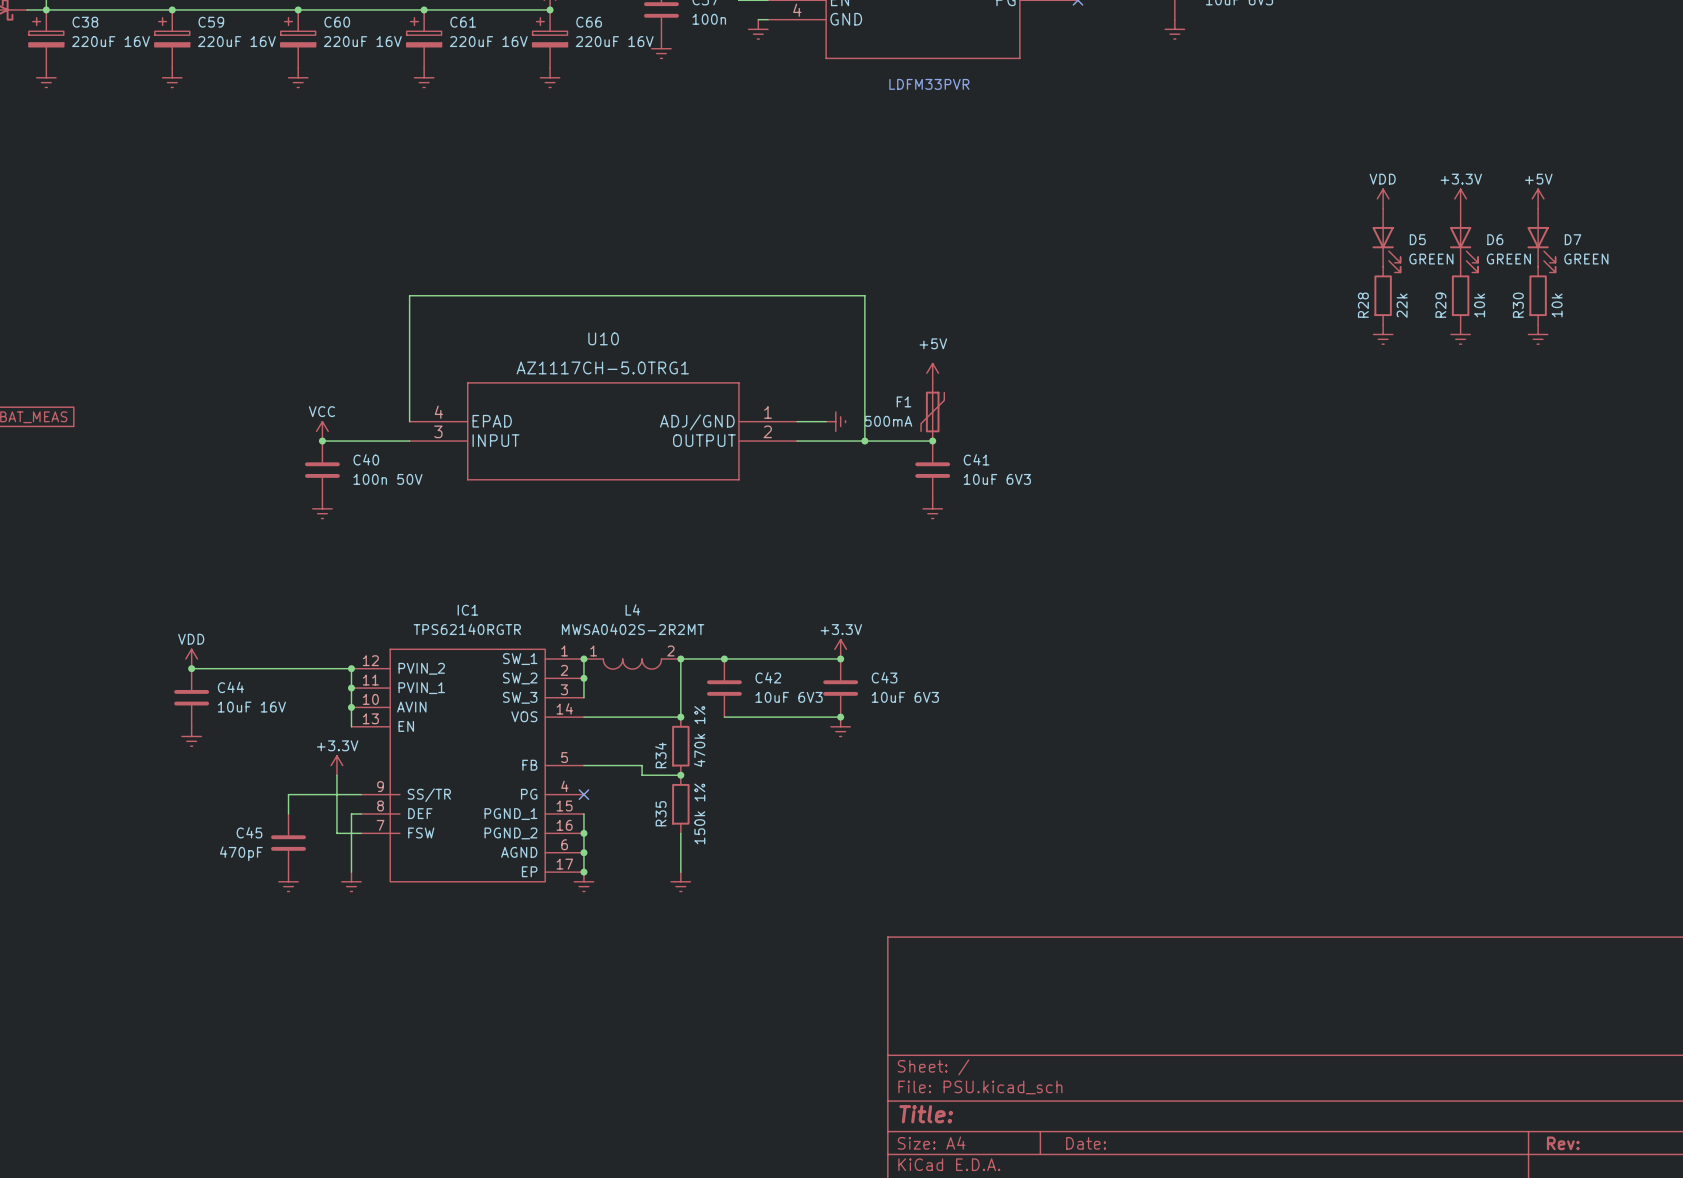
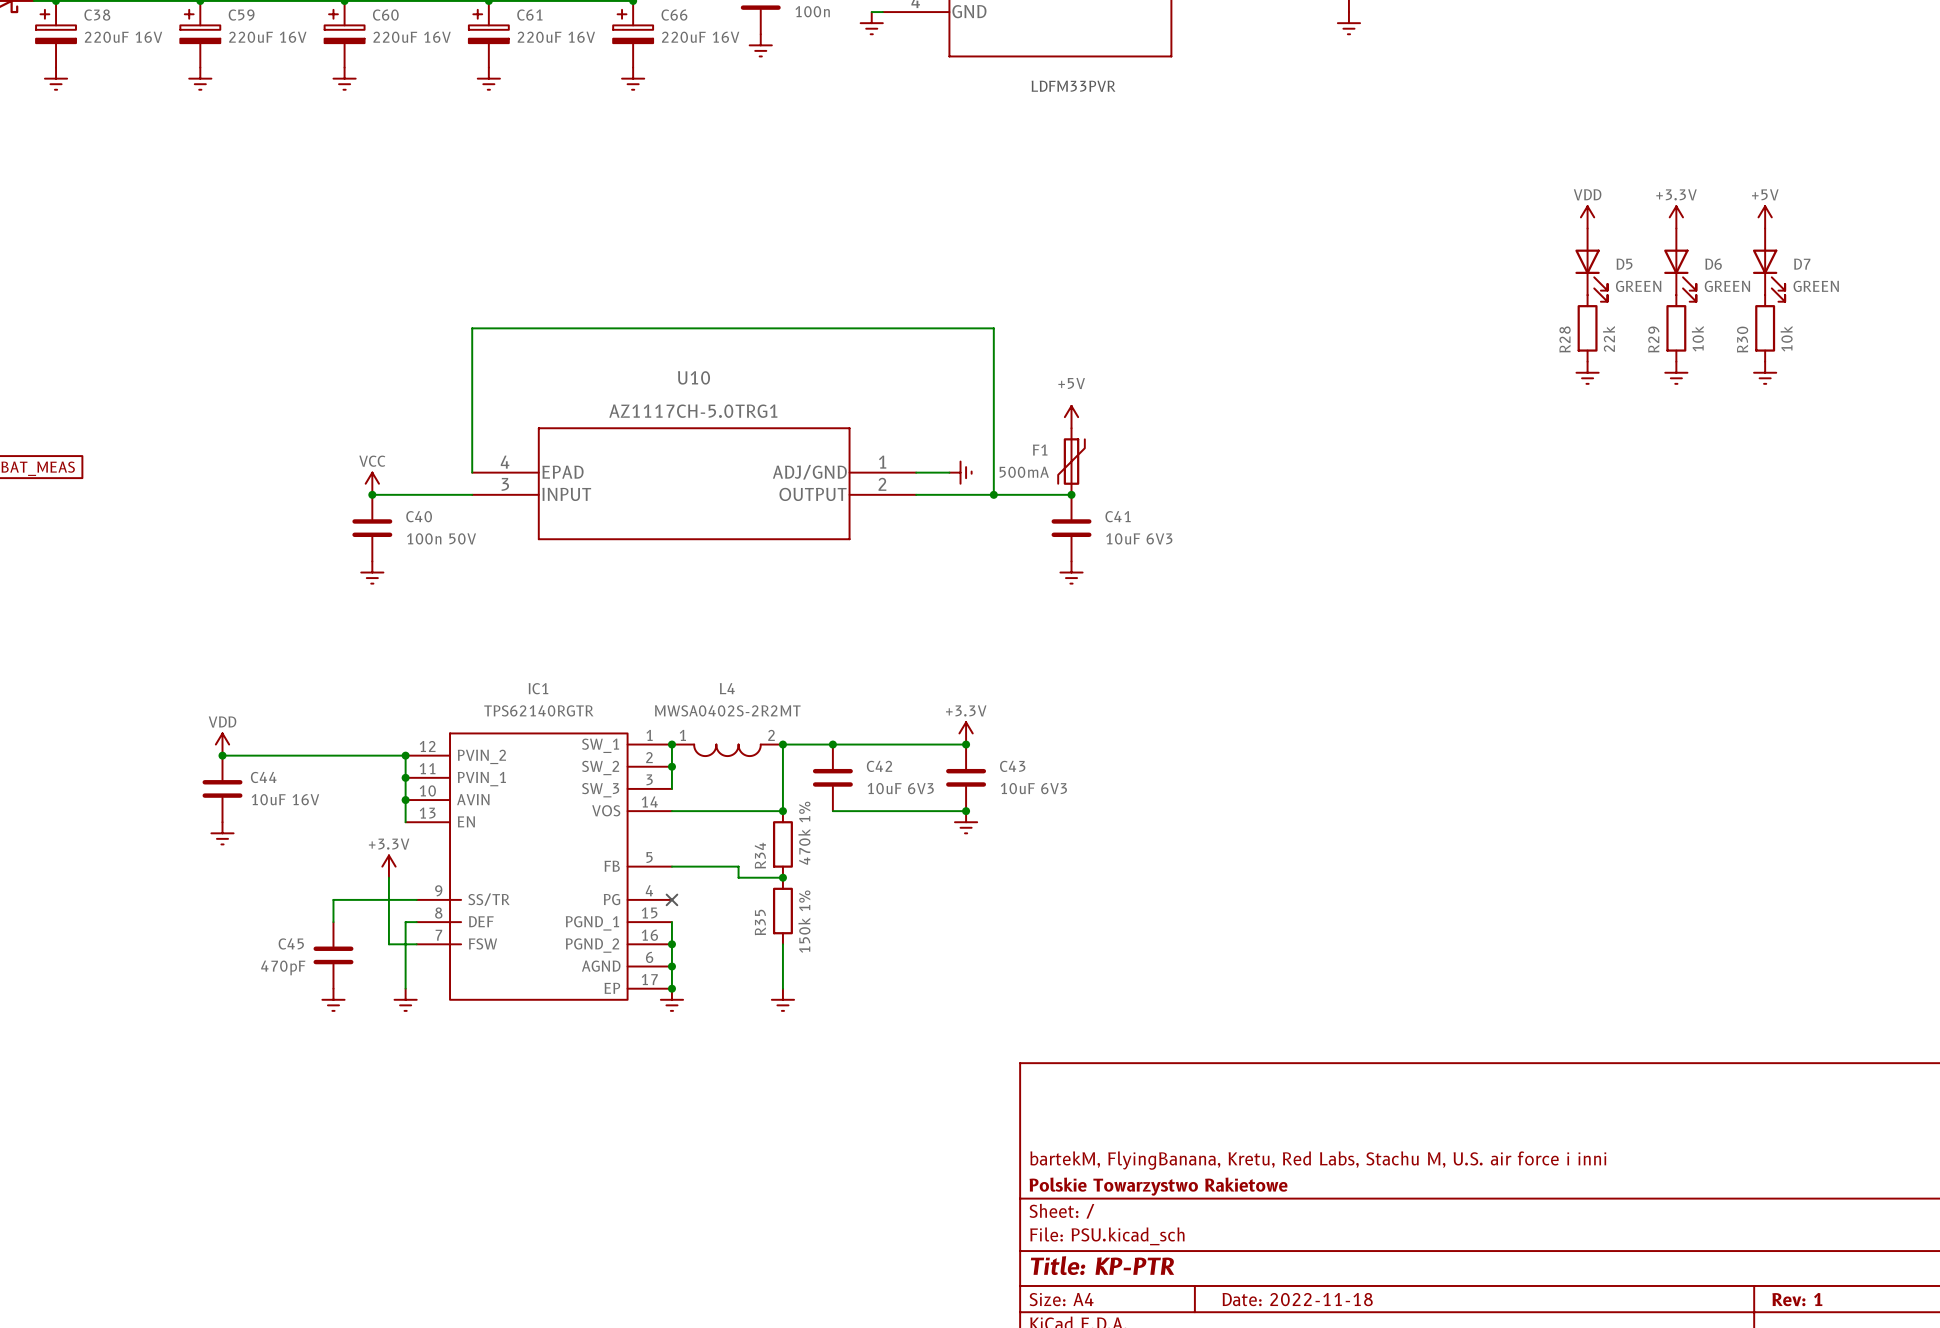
title block: none -> bartekM, FlyingBanana, Kretu, Red Labs, Stachu M, U.S. air force i inni (1318, 1160)
title block: none -> Polskie Towarzystwo Rakietowe (1158, 1186)
title block: Title: (926, 1114) -> Title: KP-PTR (1102, 1265)
title block: Date: (1086, 1143) -> Date: 2022-11-18 (1297, 1299)
title block: Rev: (1563, 1143) -> Rev: 1 (1797, 1299)

